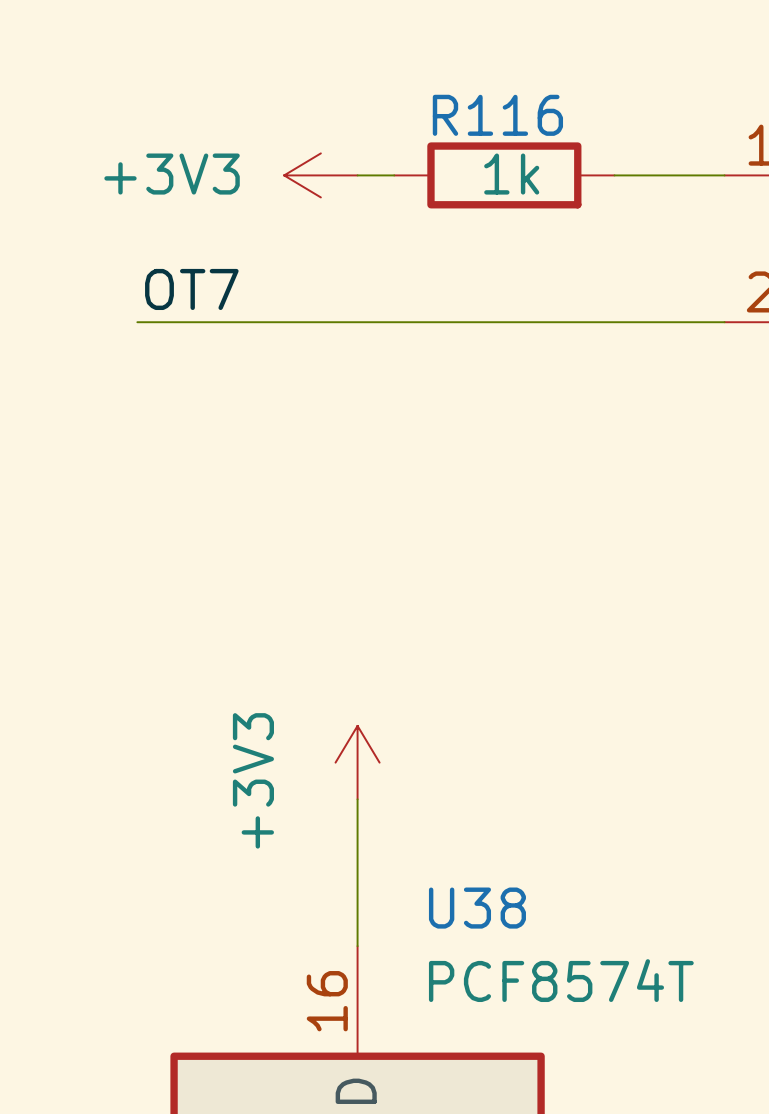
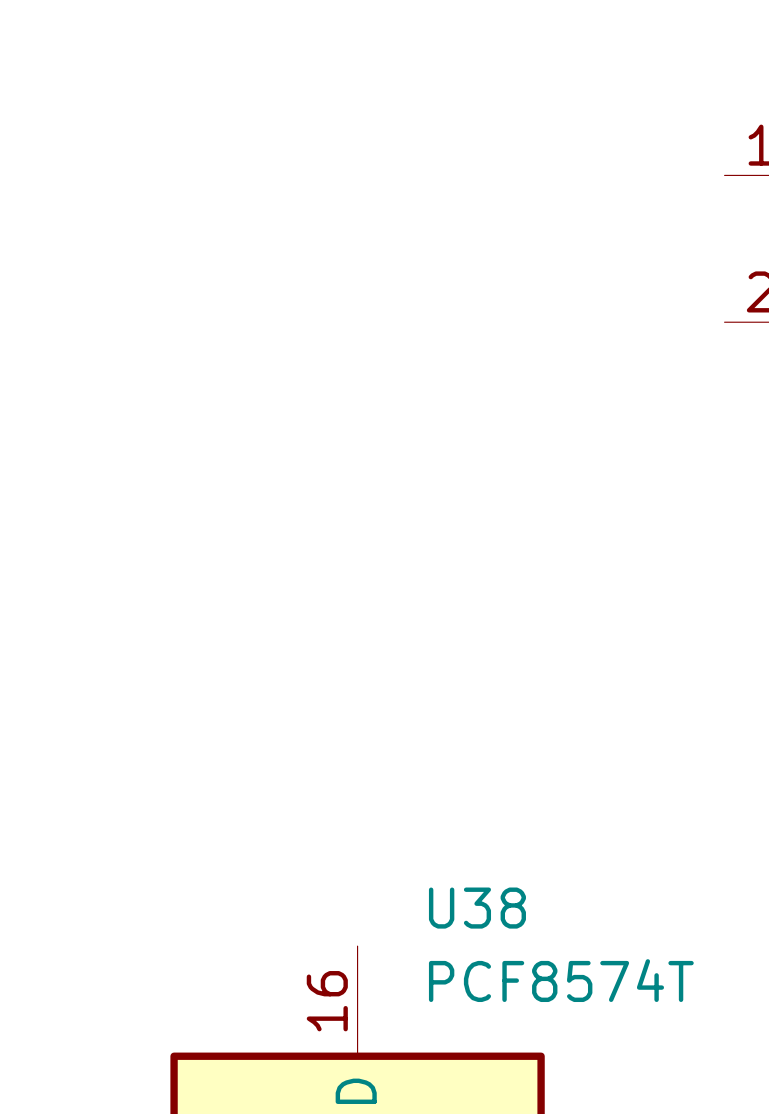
power symbol: +3V3 (320, 175) -> none
wire: (357, 175) (394, 175) -> none
R116: 1k (504, 175) -> none
wire: (614, 175) (724, 175) -> none
label: OT7 (191, 289) -> none
wire: (137, 322) (724, 322) -> none
power symbol: +3V3 (357, 762) -> none
wire: (357, 799) (357, 946) -> none

